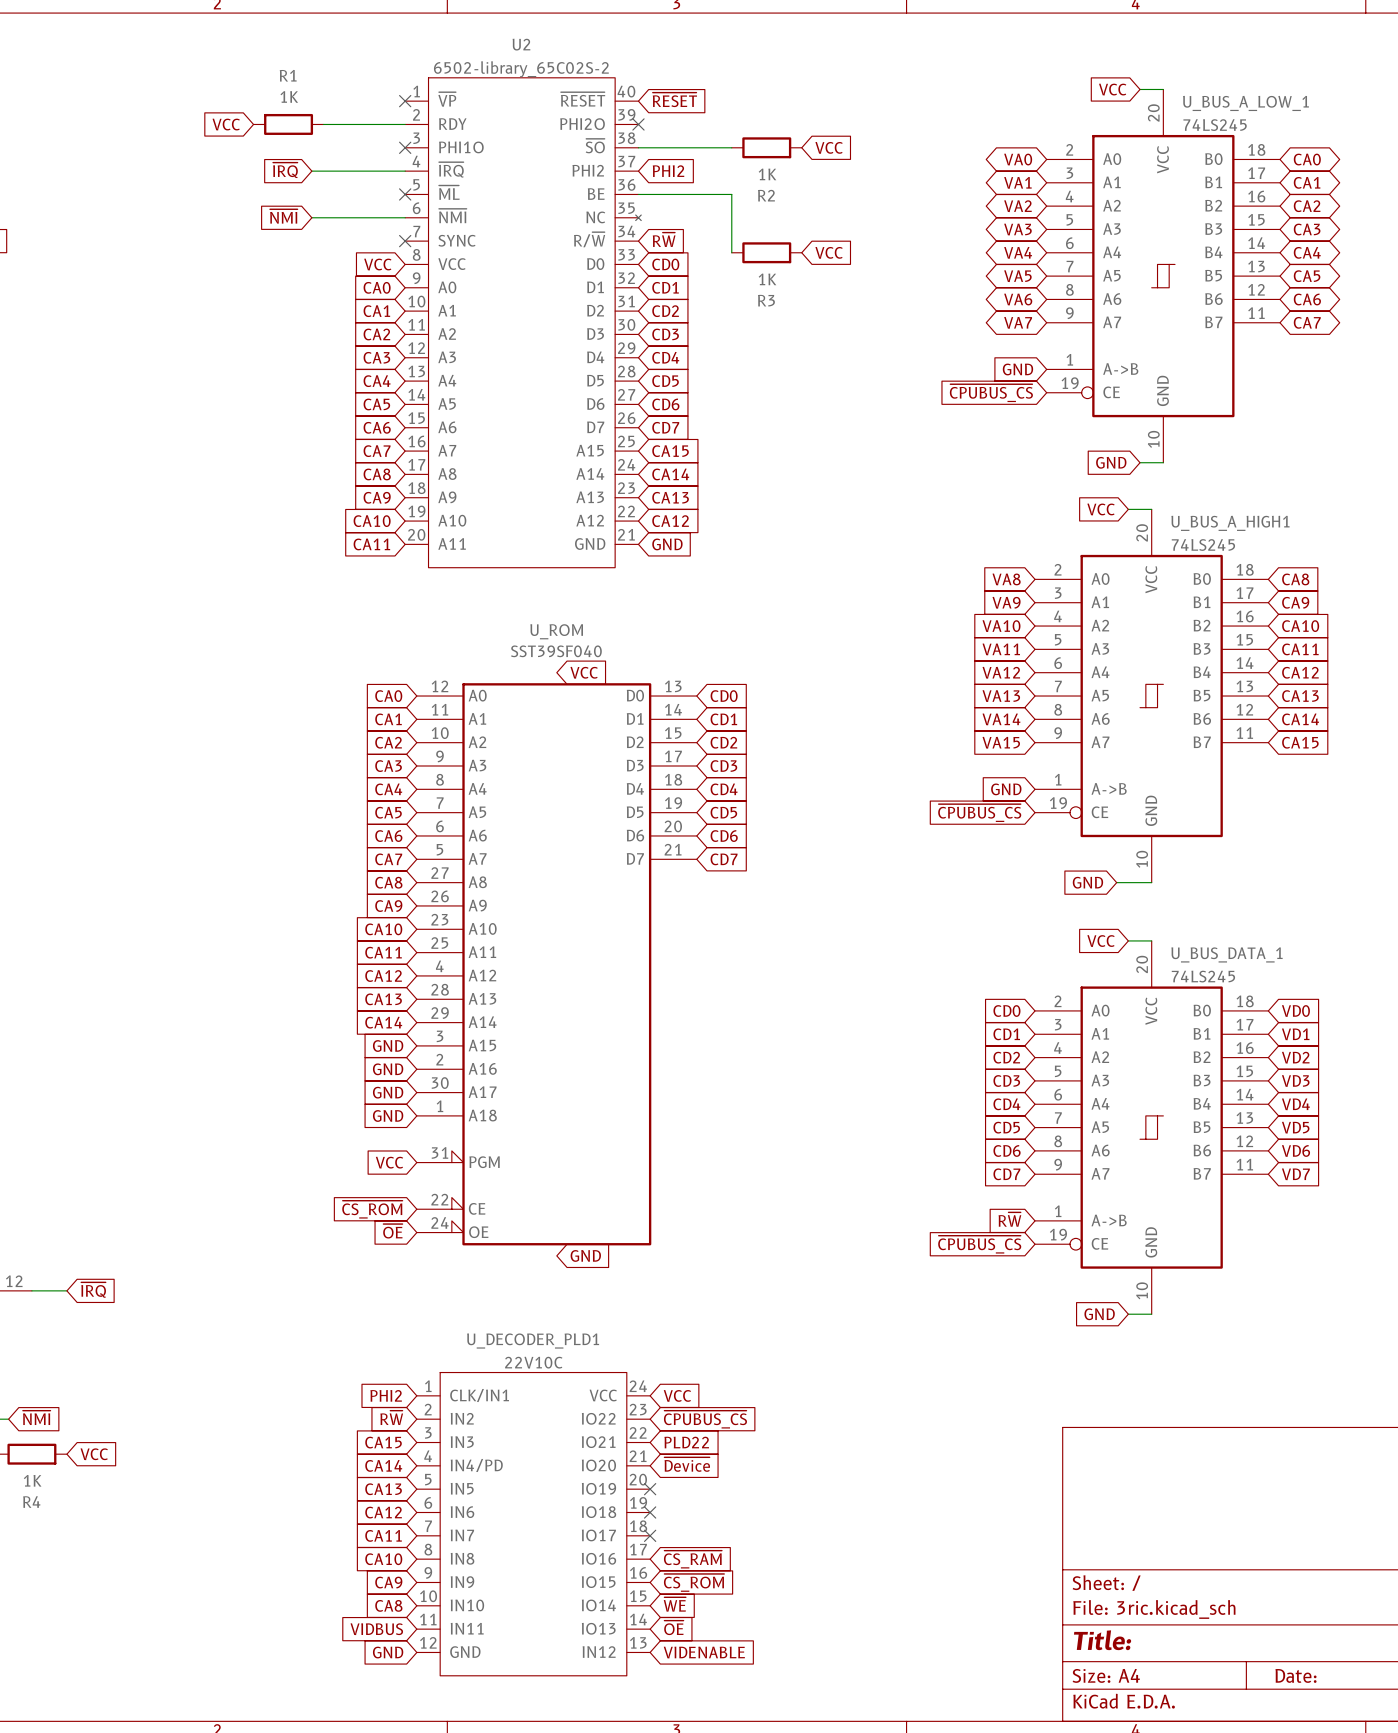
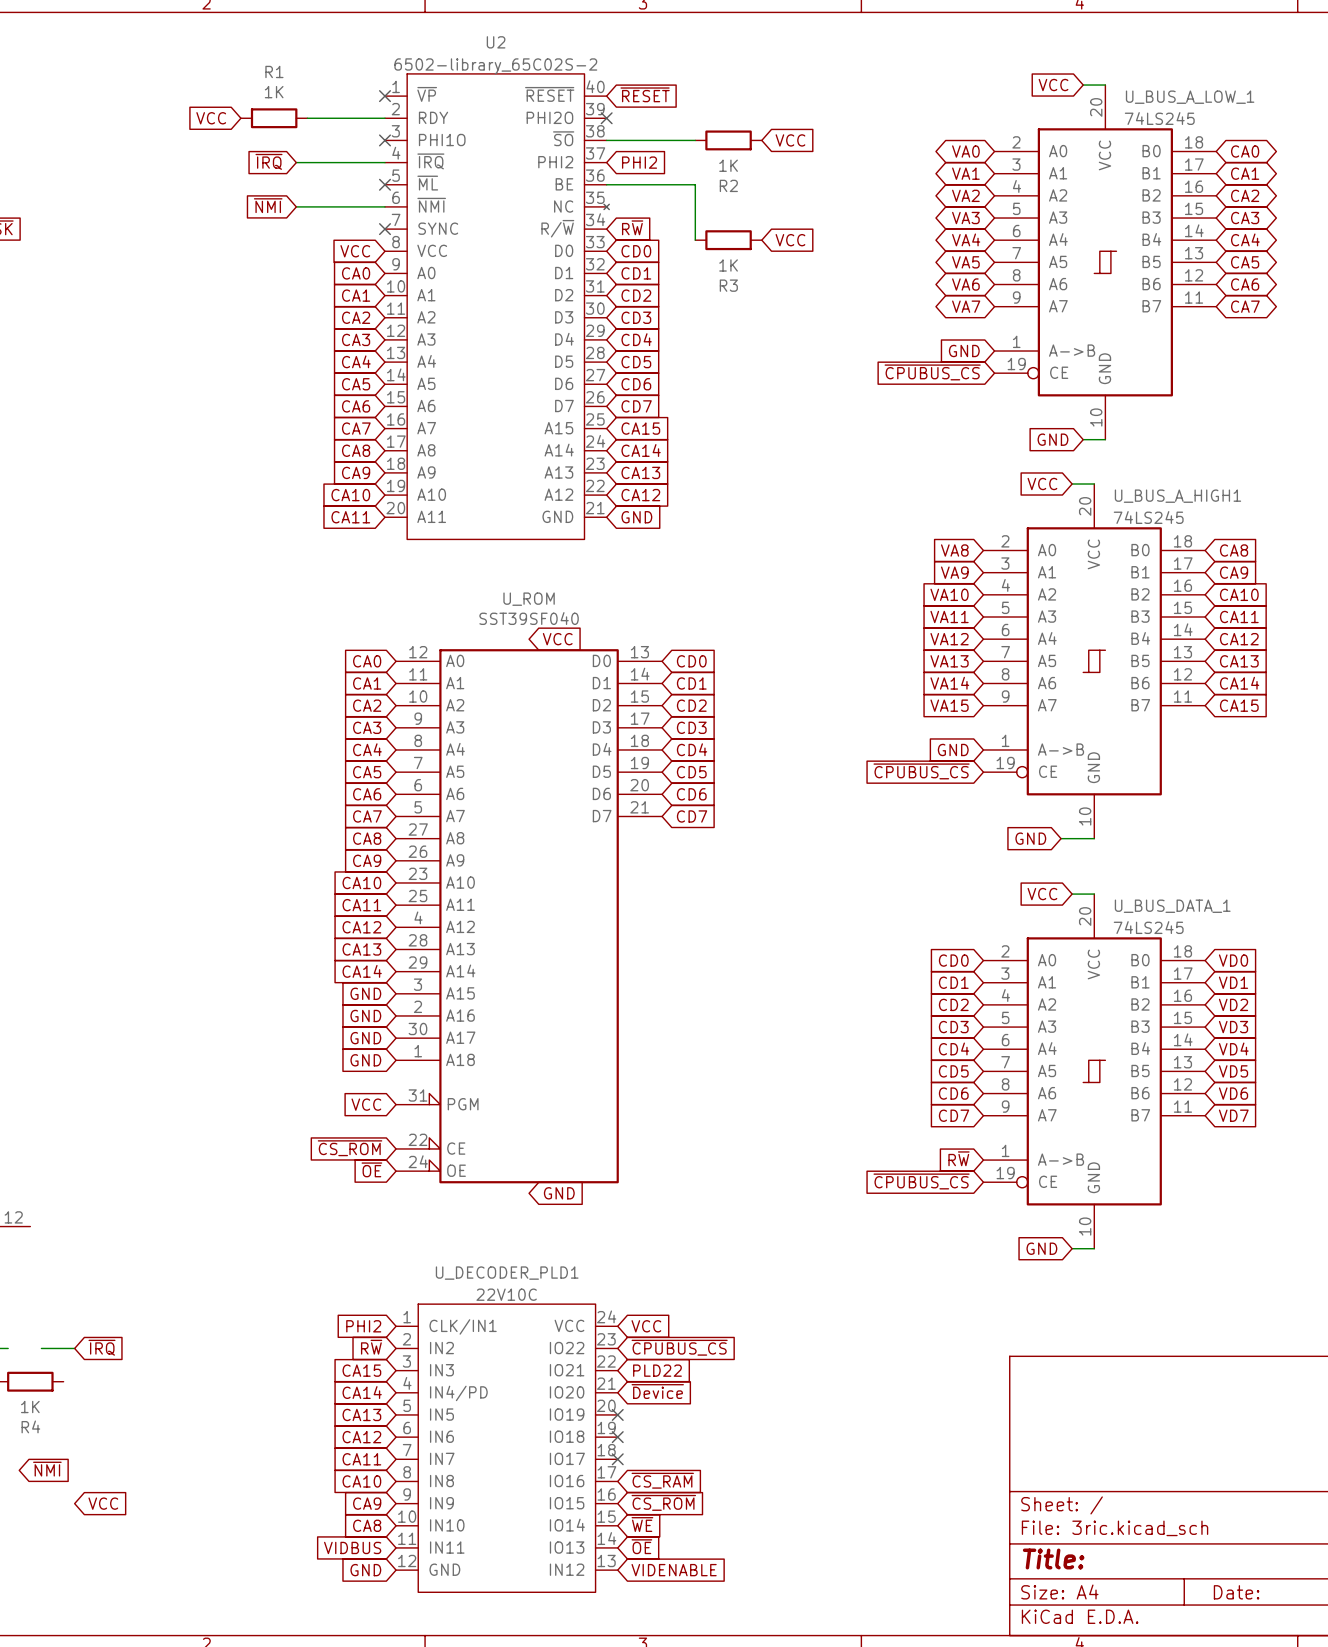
wire: (31, 1290) (66, 1290) -> (41, 1348) (74, 1348)
global label position: ~{IRQ} (93, 1290) -> ~{IRQ} (102, 1347)
global label position: ~{NMI} (36, 1417) -> ~{NMI} (47, 1469)
global label position: VCC (94, 1454) -> VCC (103, 1503)

